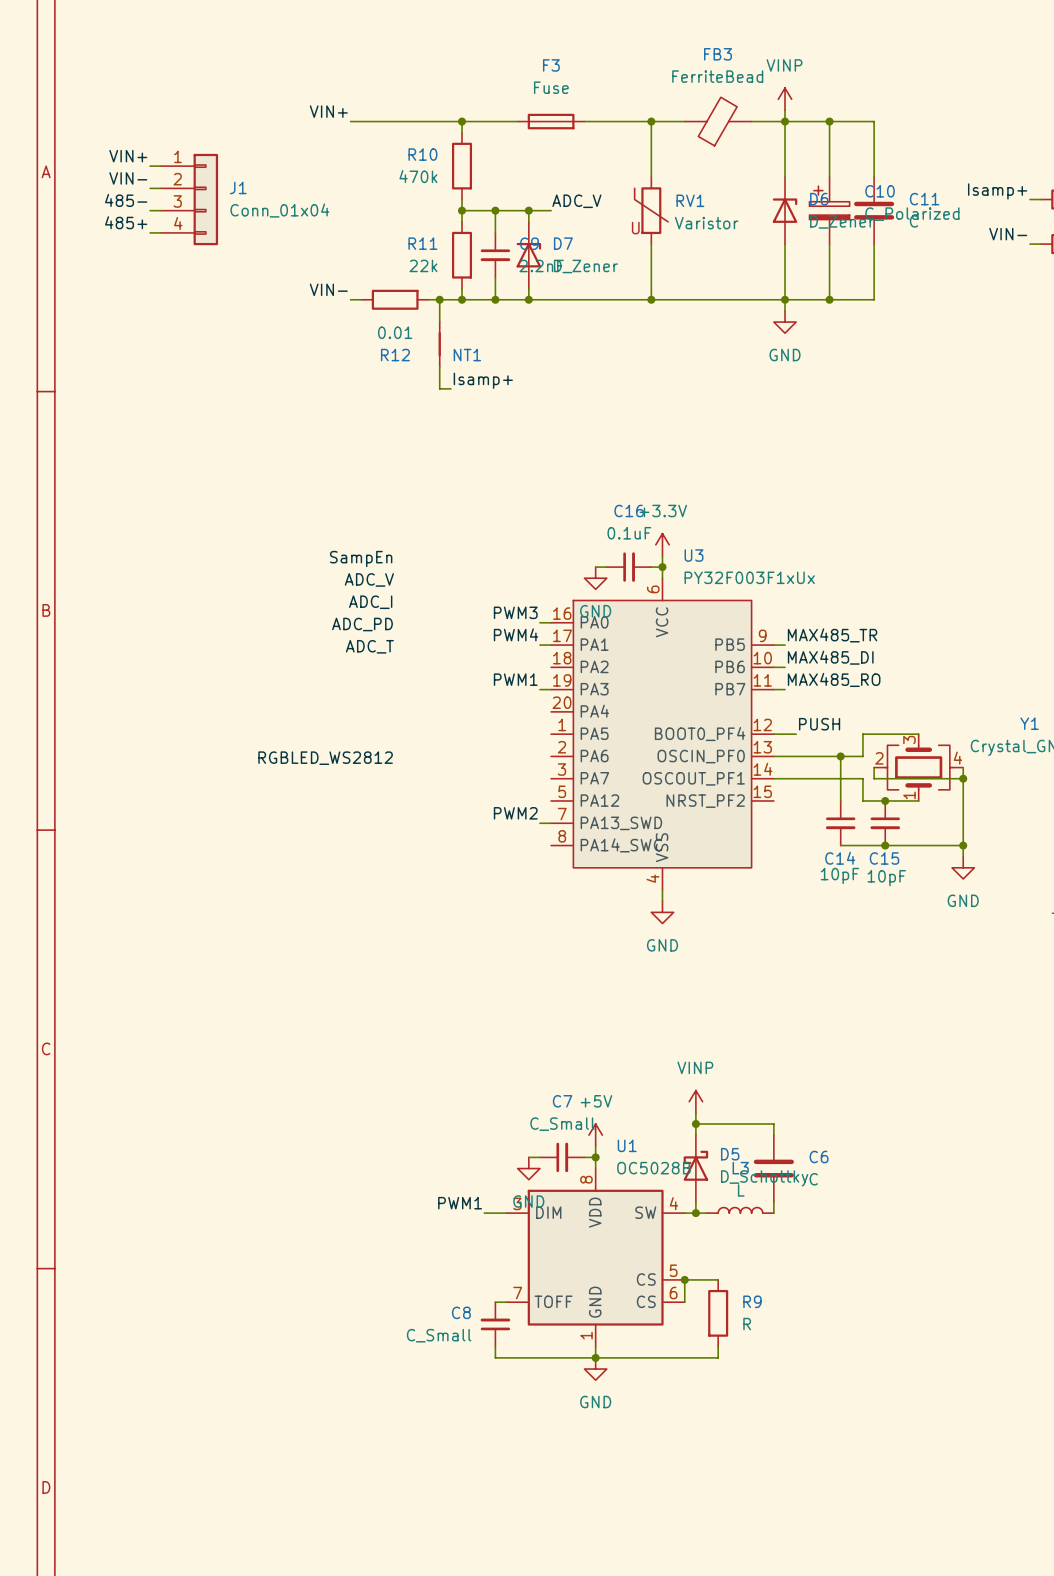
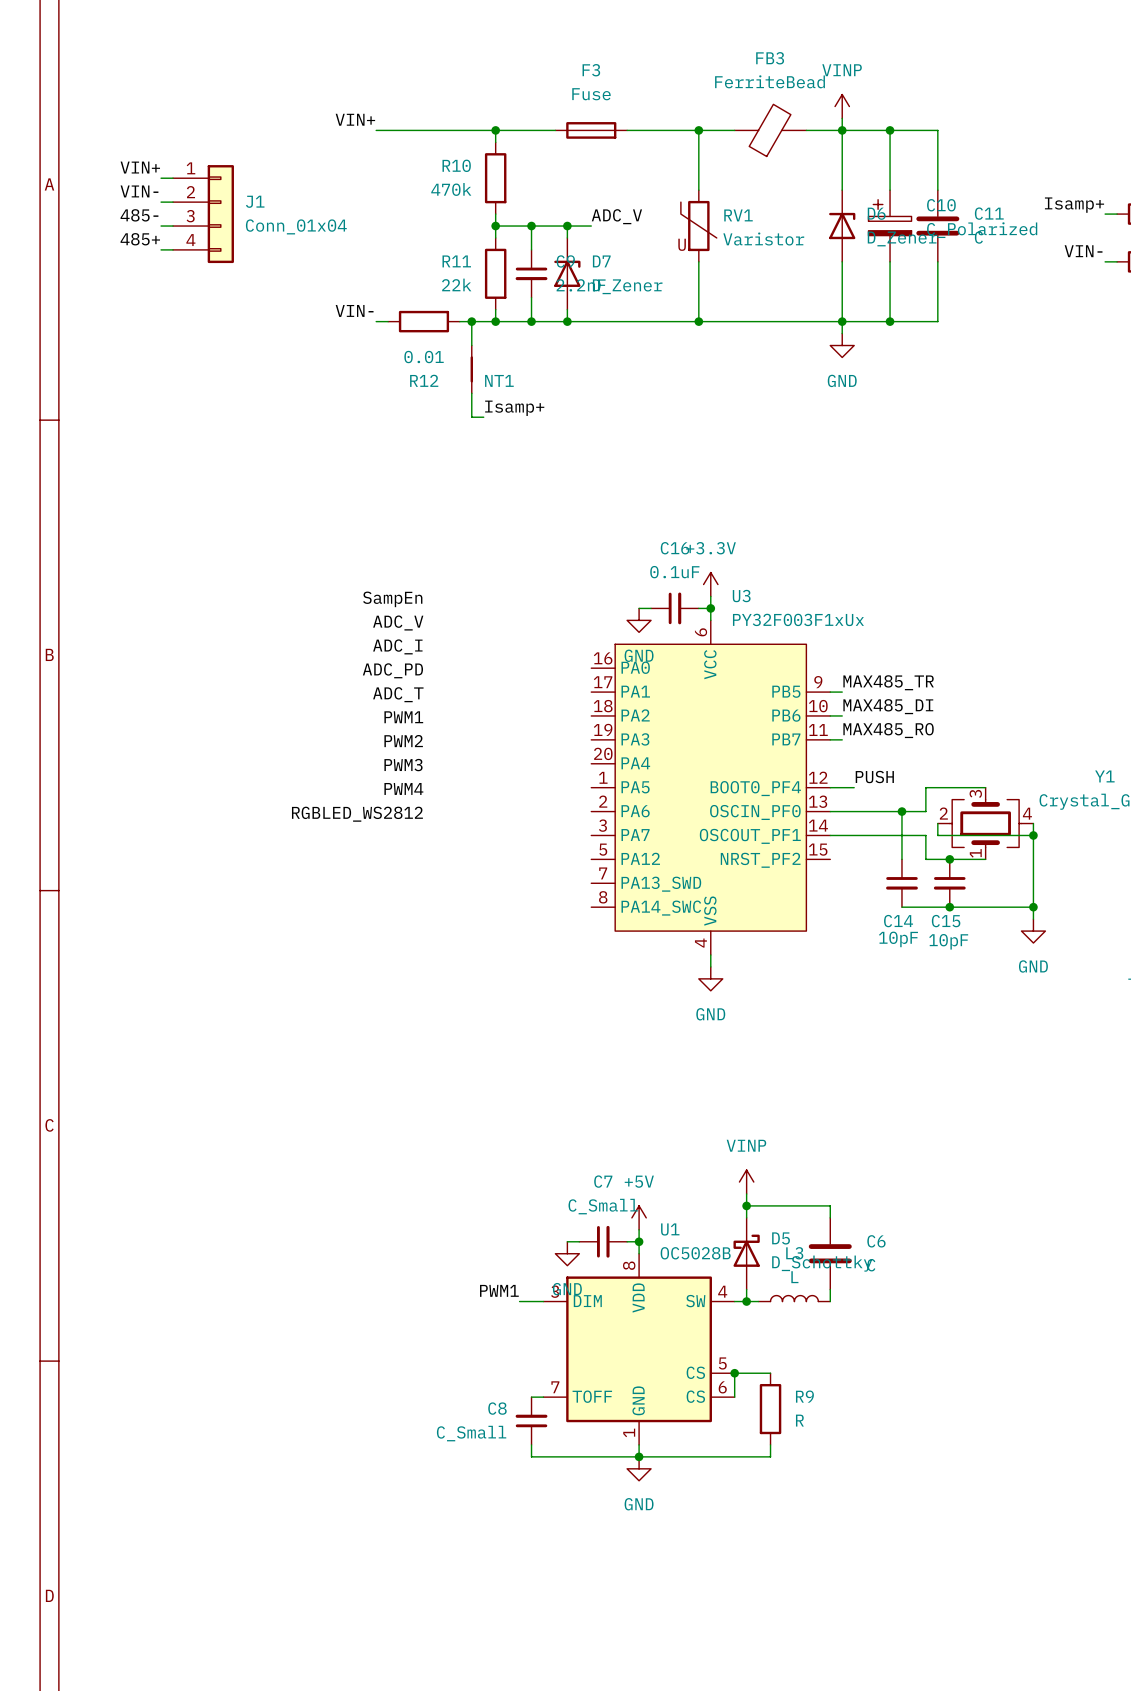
label position: PWM3 (515, 612) -> PWM3 (403, 765)
wire: (539, 622) (551, 622) -> none
label position: PWM4 (516, 634) -> PWM4 (403, 788)
wire: (539, 645) (551, 645) -> none
label position: PWM1 (515, 679) -> PWM1 (403, 717)
wire: (539, 689) (551, 689) -> none
label position: PWM2 (515, 813) -> PWM2 (403, 741)
wire: (539, 823) (551, 823) -> none

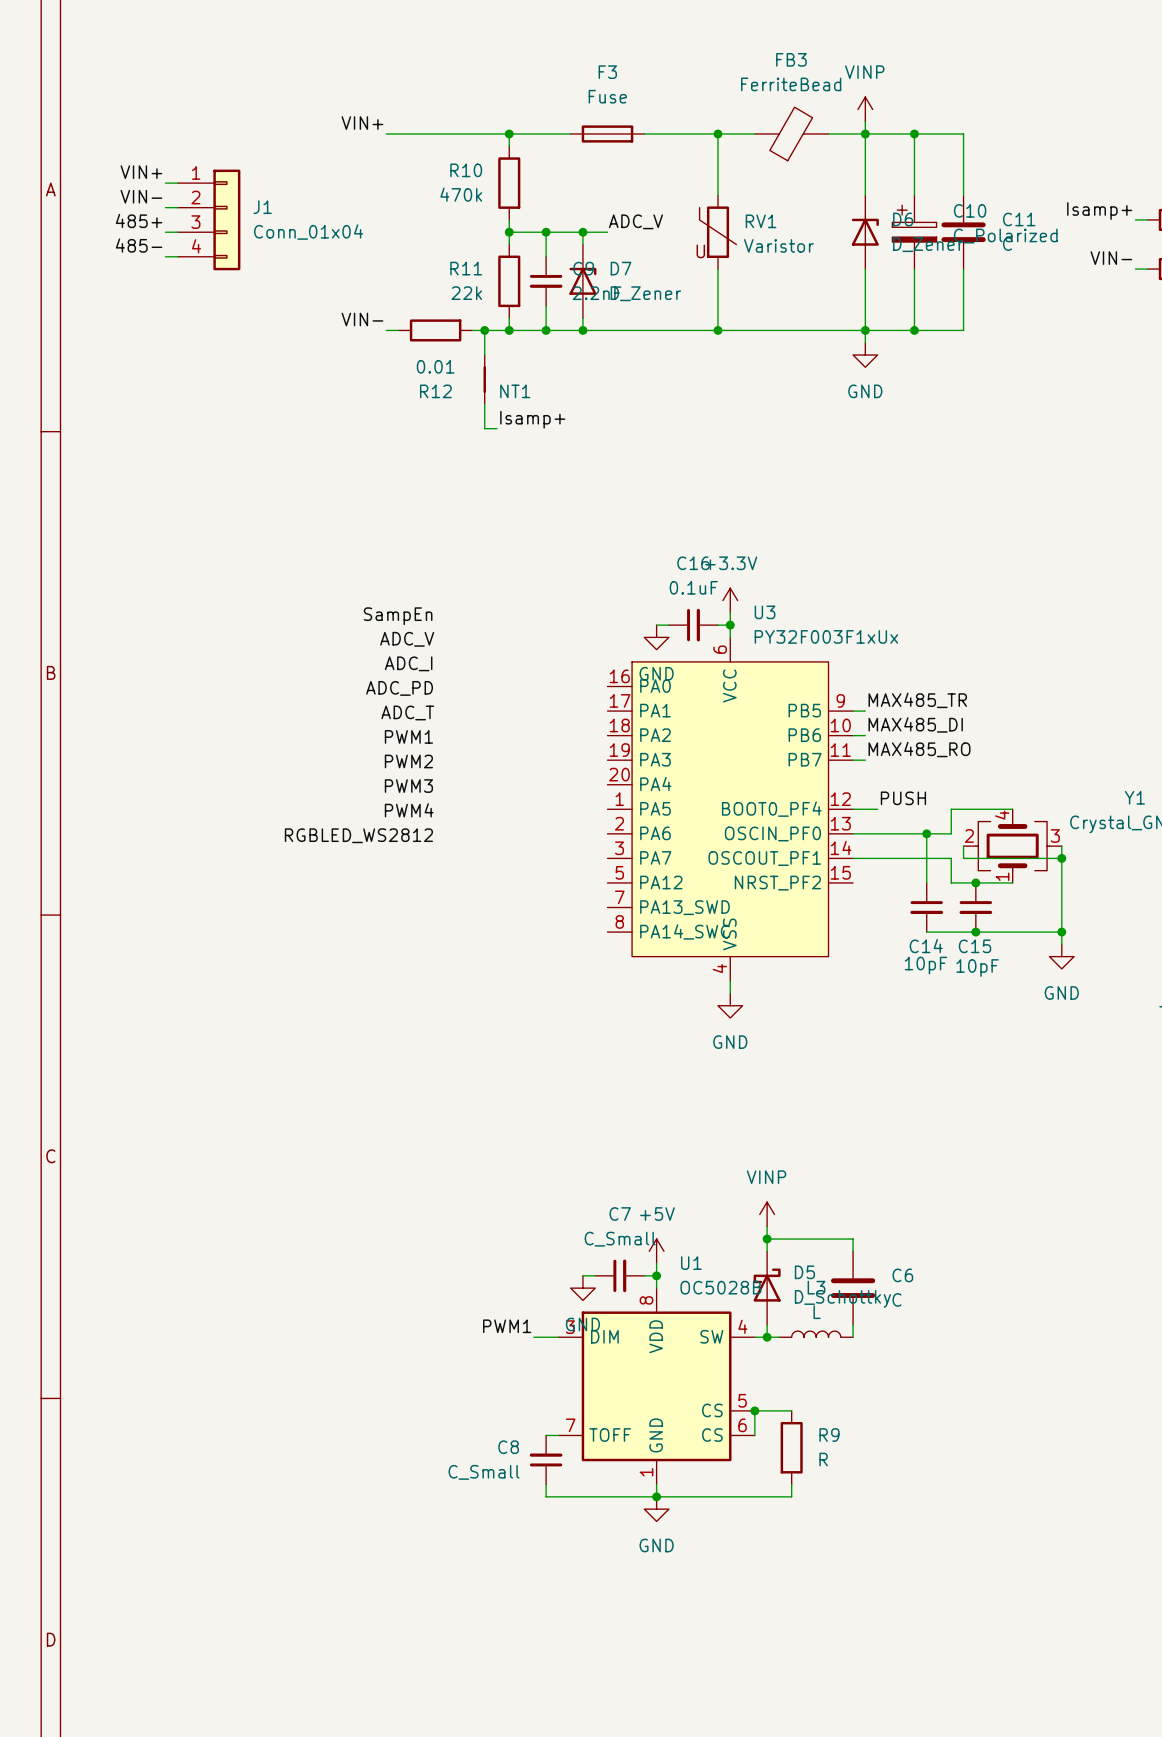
label: 485- (139, 215) -> 485+ (139, 220)
label: 485+ (140, 239) -> 485- (139, 245)
Y1 pin number: 3 (975, 793) -> 4 (1002, 815)
Y1 pin number: 4 (1027, 813) -> 3 (1055, 835)

